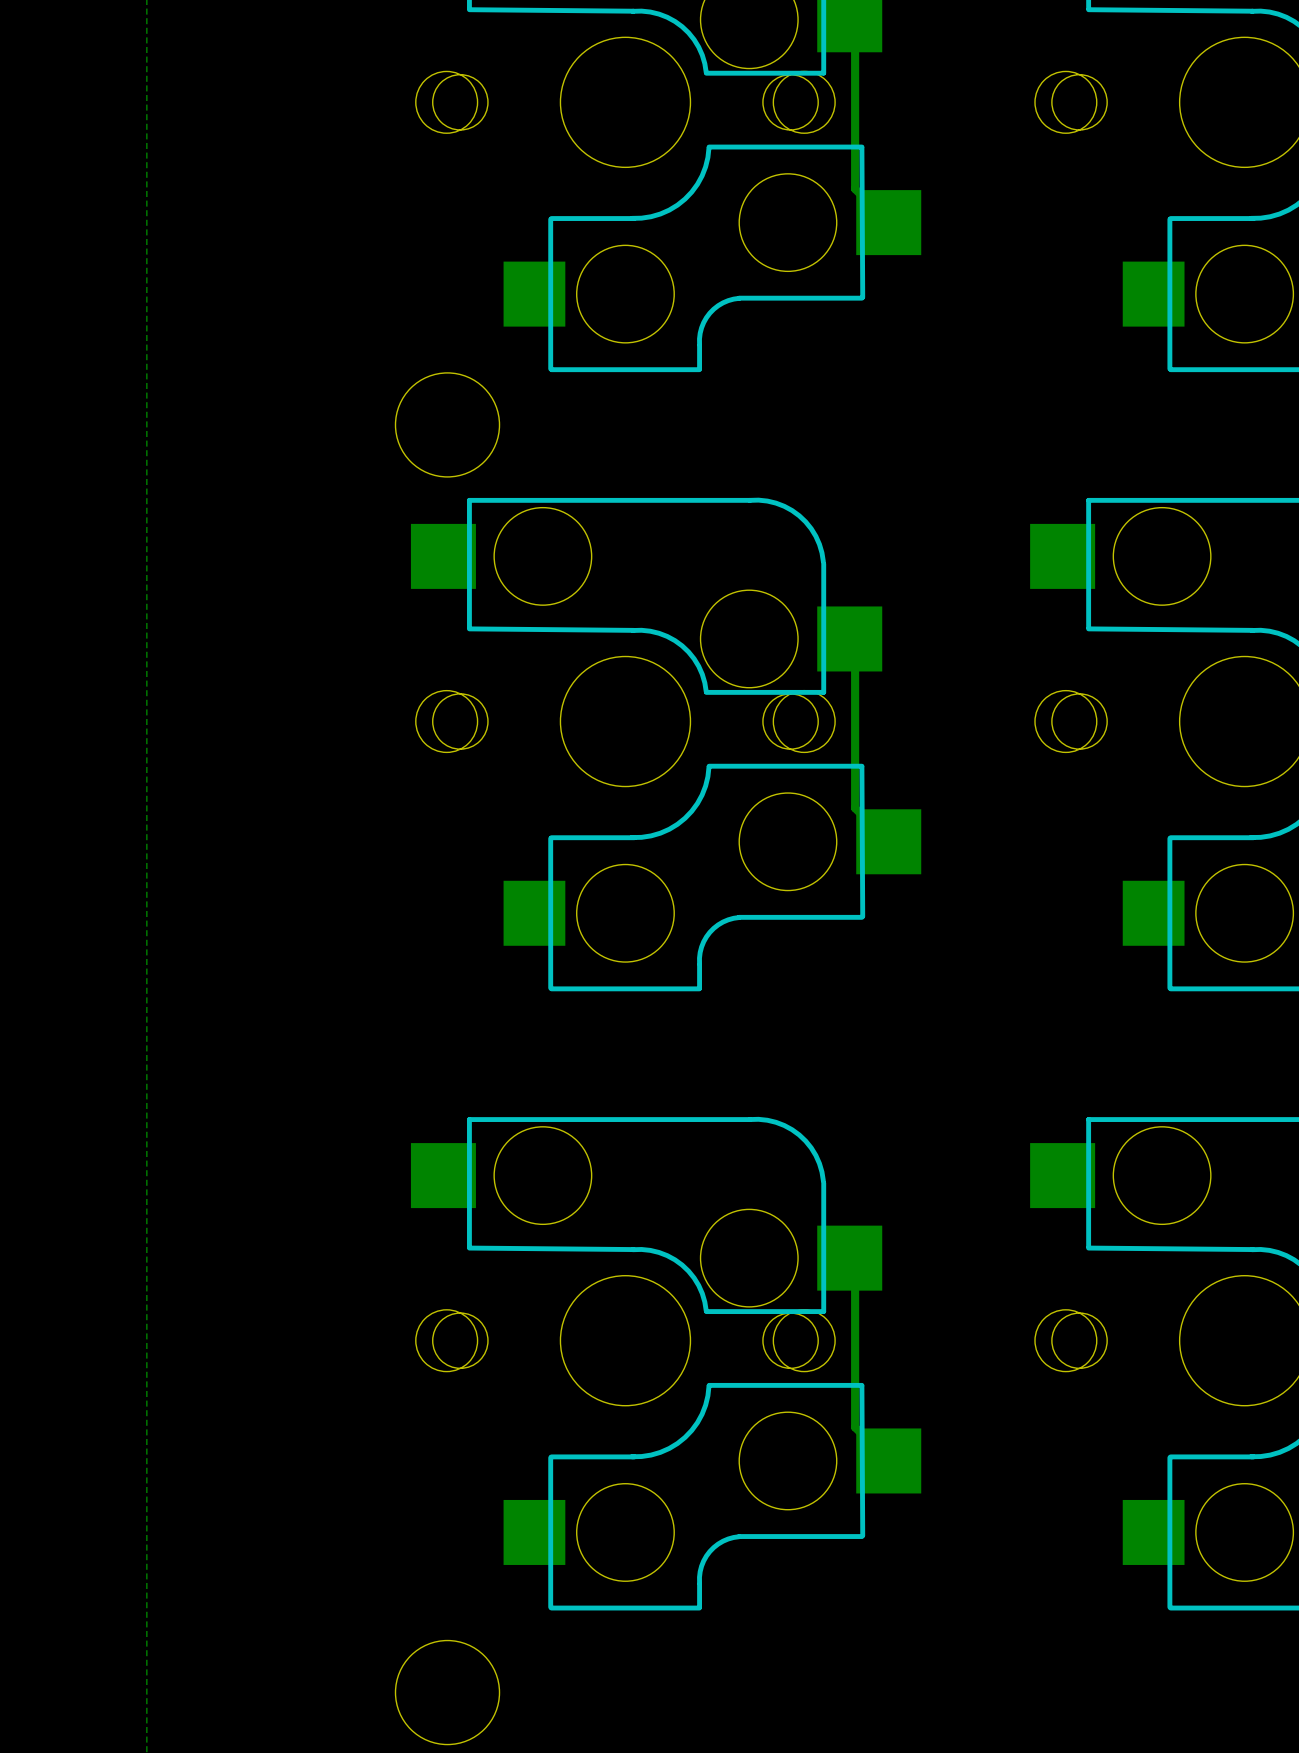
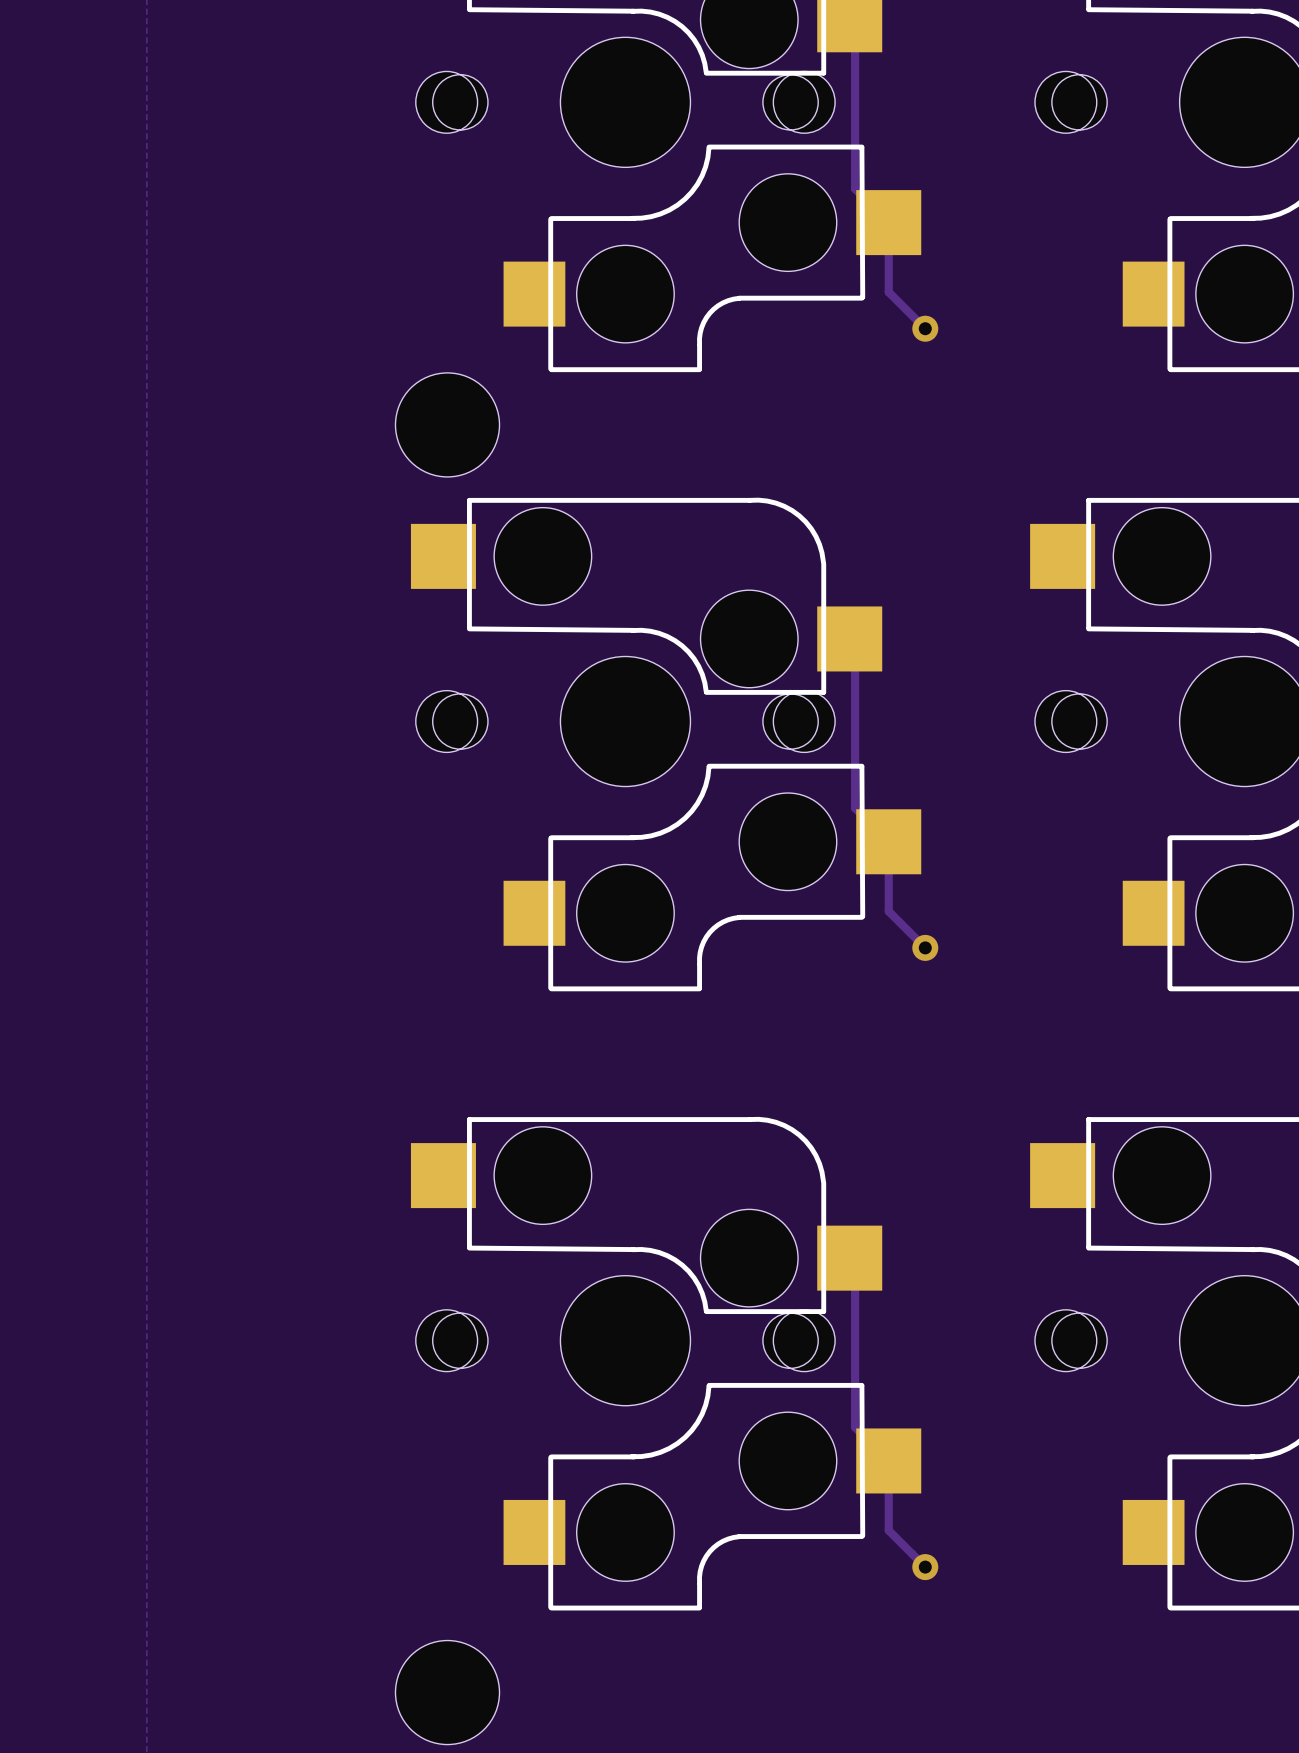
track: none -> (888, 222) (888, 292) (925, 328)
via: none -> (925, 328)
track: none -> (888, 841) (888, 911) (925, 947)
via: none -> (925, 947)
track: none -> (888, 1460) (888, 1530) (925, 1567)
via: none -> (925, 1567)

